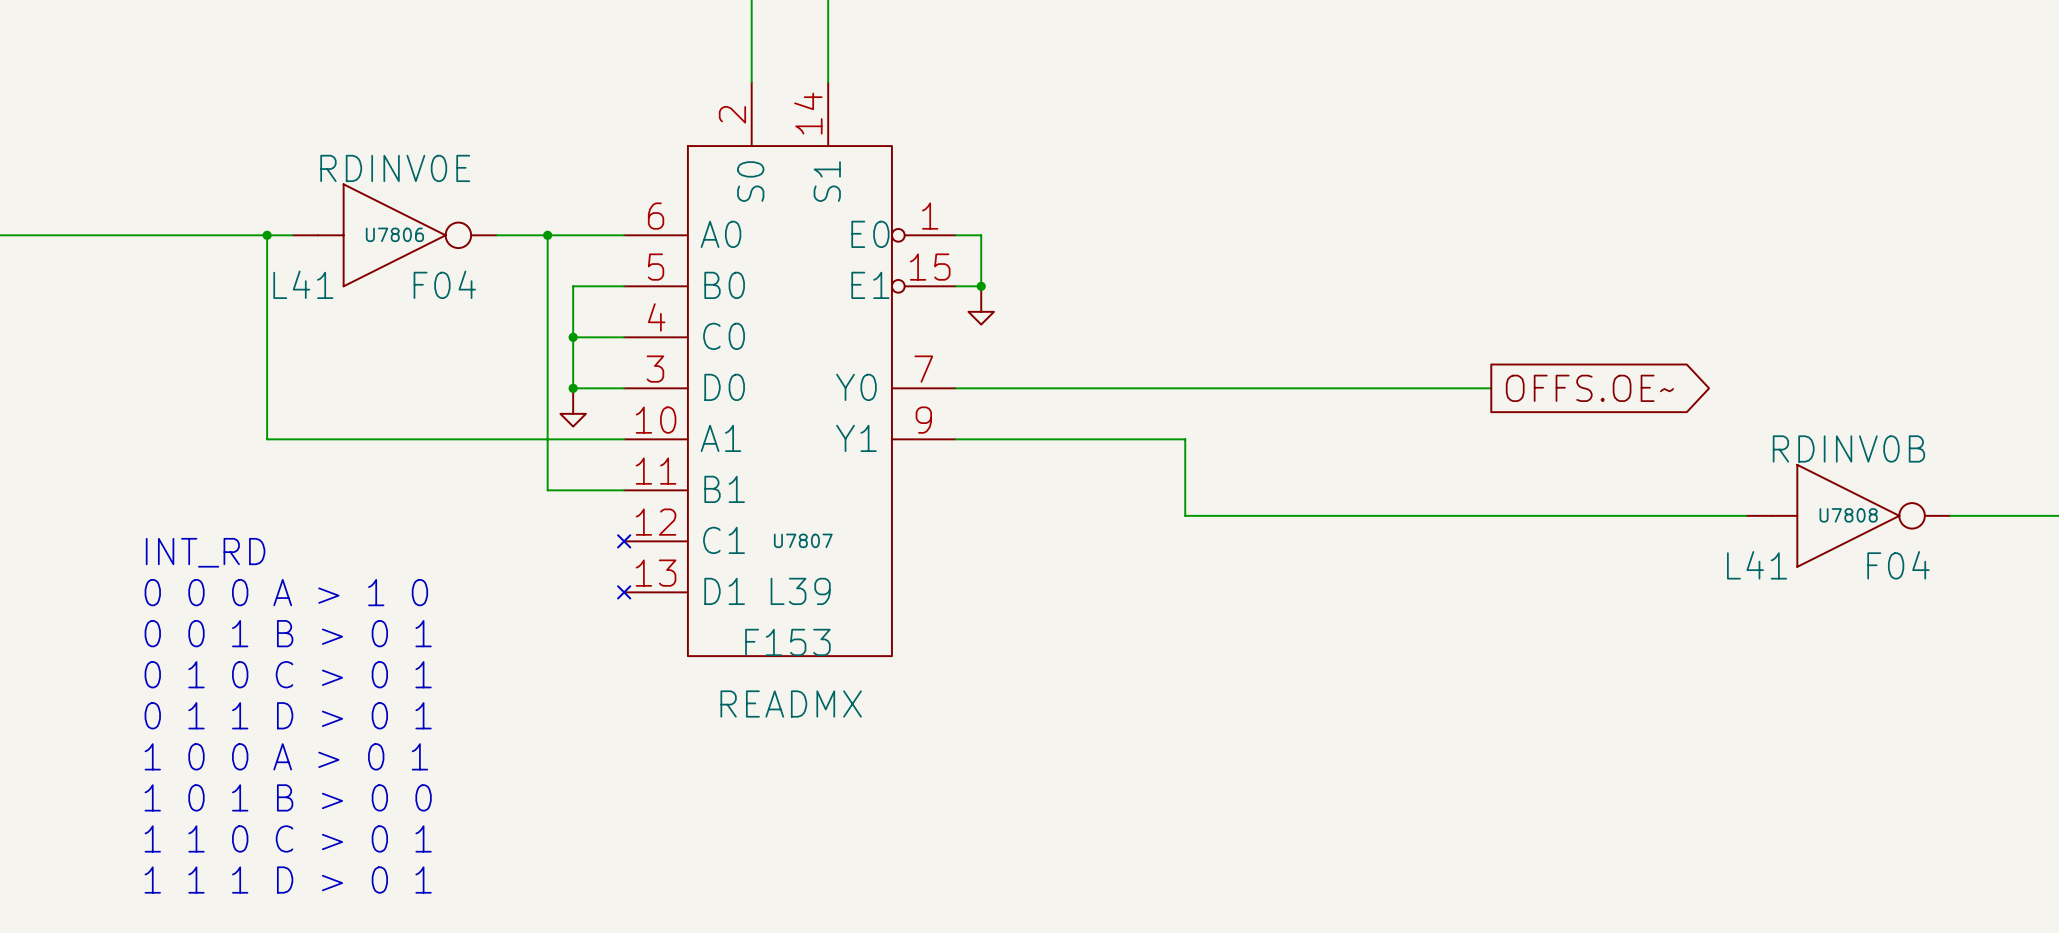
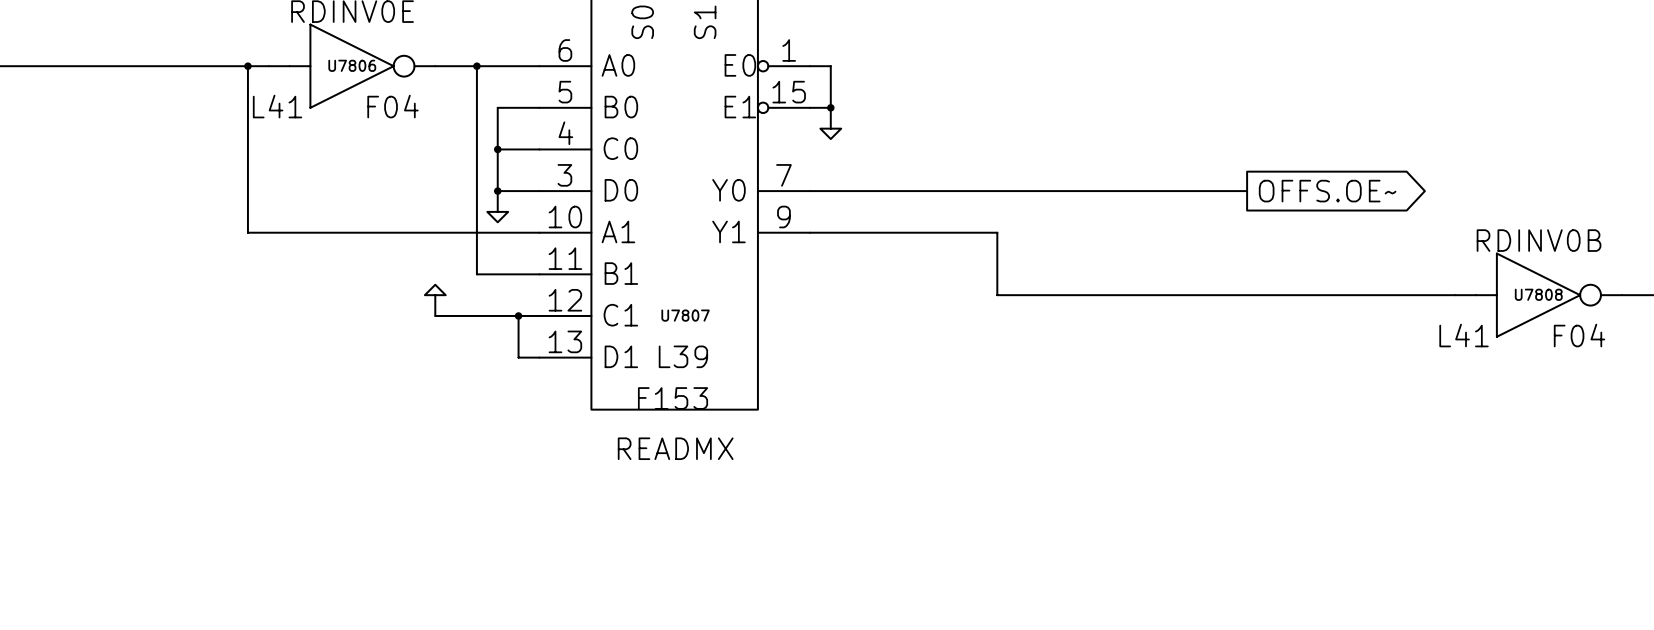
power symbol: none -> (435, 300)
wire: none -> (435, 315) (539, 315)
wire: none -> (518, 315) (518, 357) (539, 357)
junction: none -> (518, 315)
no-connect mark: (624, 541) -> none
text: INT_RD (205, 552) -> none
text: 0 0 0 A > 1 0 (286, 592) -> none
no-connect mark: (624, 592) -> none
text: 0 0 1 B > 0 1 (288, 633) -> none
text: 0 1 0 C > 0 1 (288, 674) -> none
text: 0 1 1 D > 0 1 (288, 715) -> none
text: 1 0 0 A > 0 1 (286, 756) -> none
text: 1 0 1 B > 0 0 (288, 797) -> none
text: 1 1 0 C > 0 1 (288, 838) -> none
text: 1 1 1 D > 0 1 (288, 880) -> none

